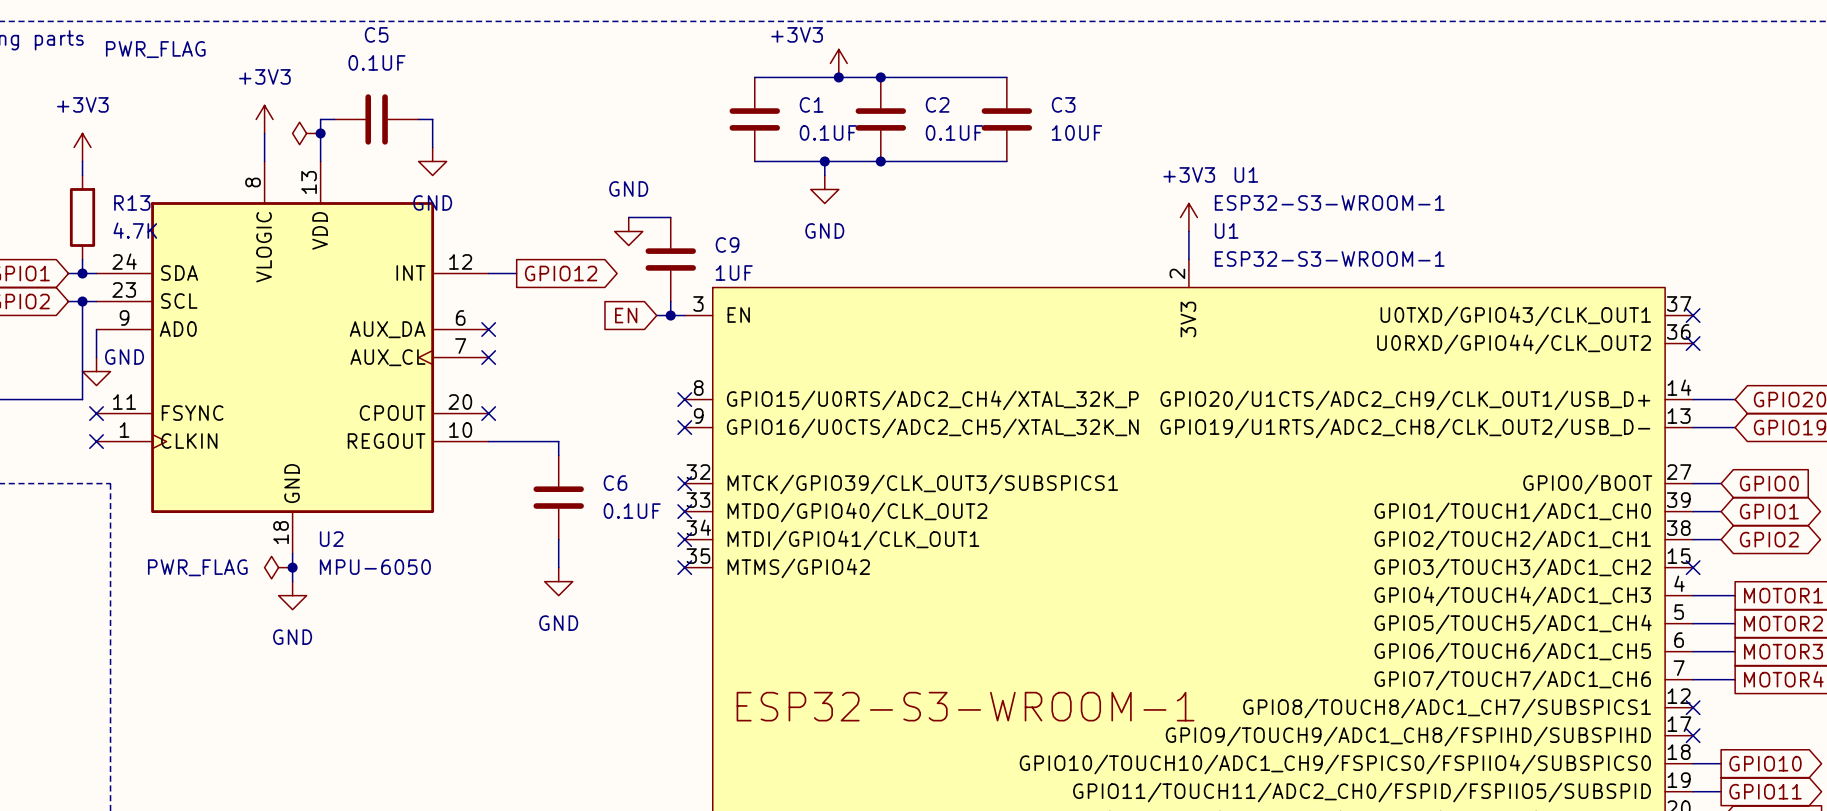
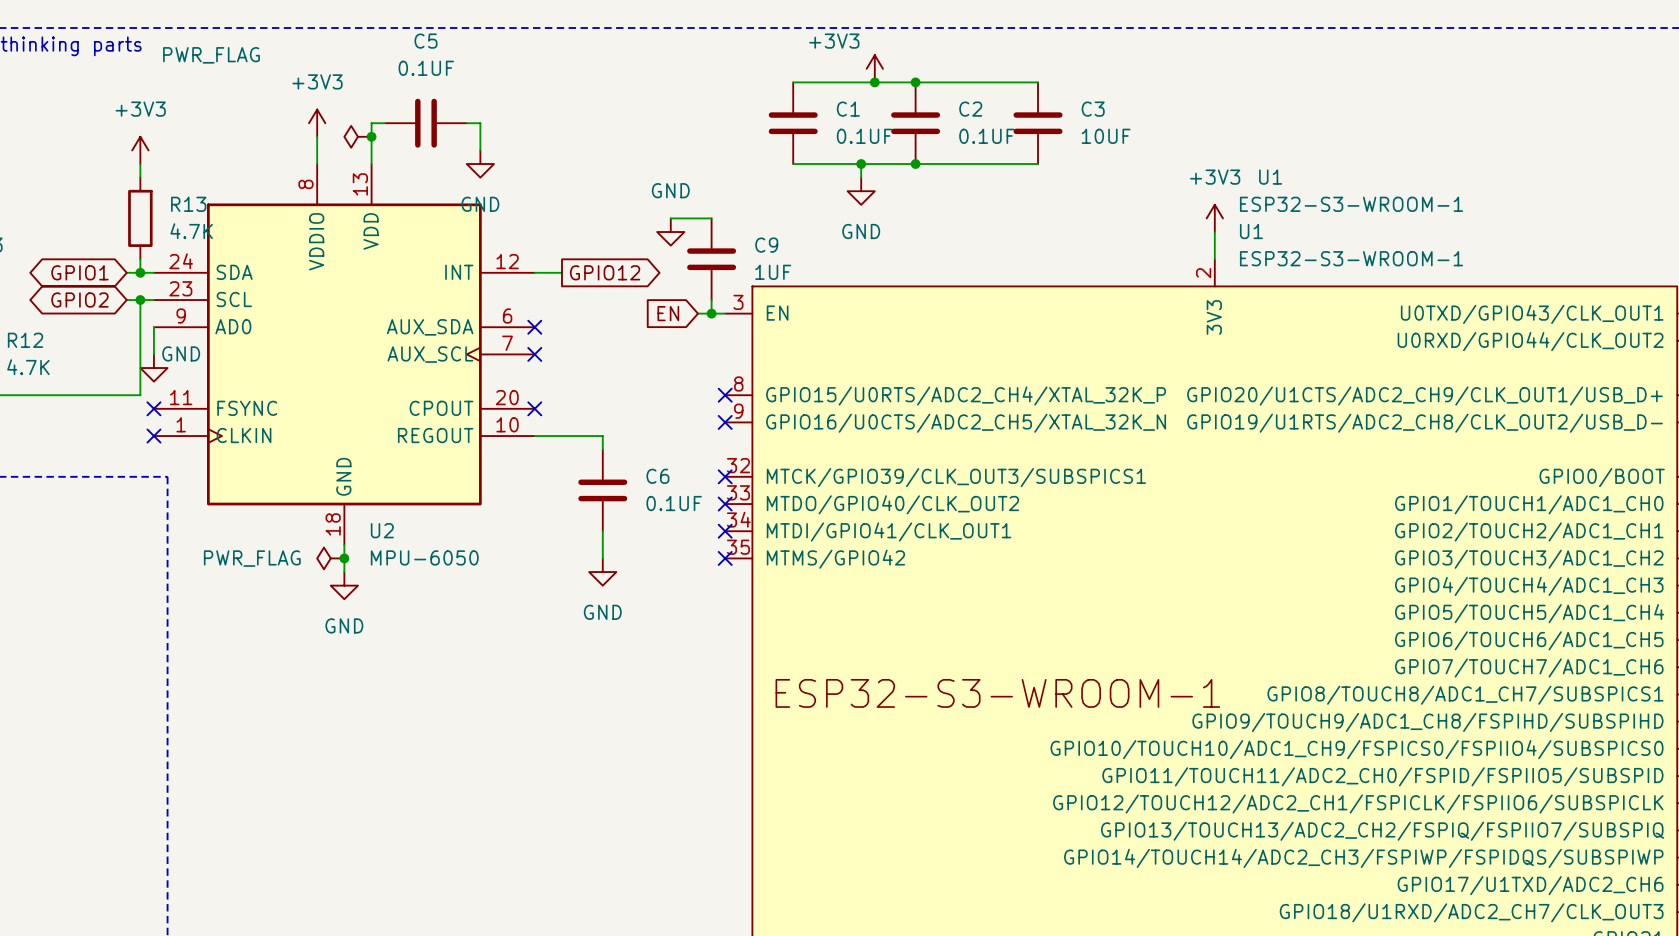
U2 pin name: VLOGIC (264, 247) -> VDDIO (316, 241)
U2 pin name: AUX_DA (387, 329) -> AUX_SDA (430, 327)
U2 pin name: AUX_CL (387, 357) -> AUX_SCL (430, 354)

